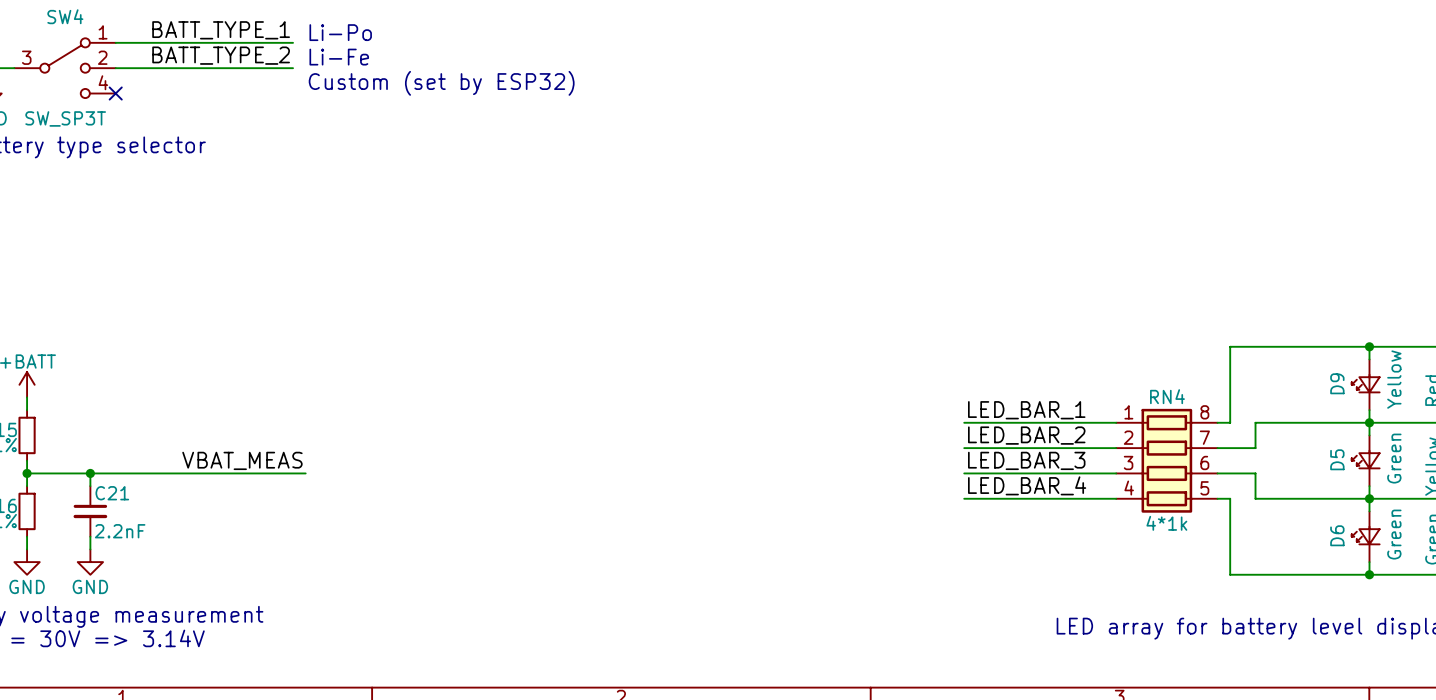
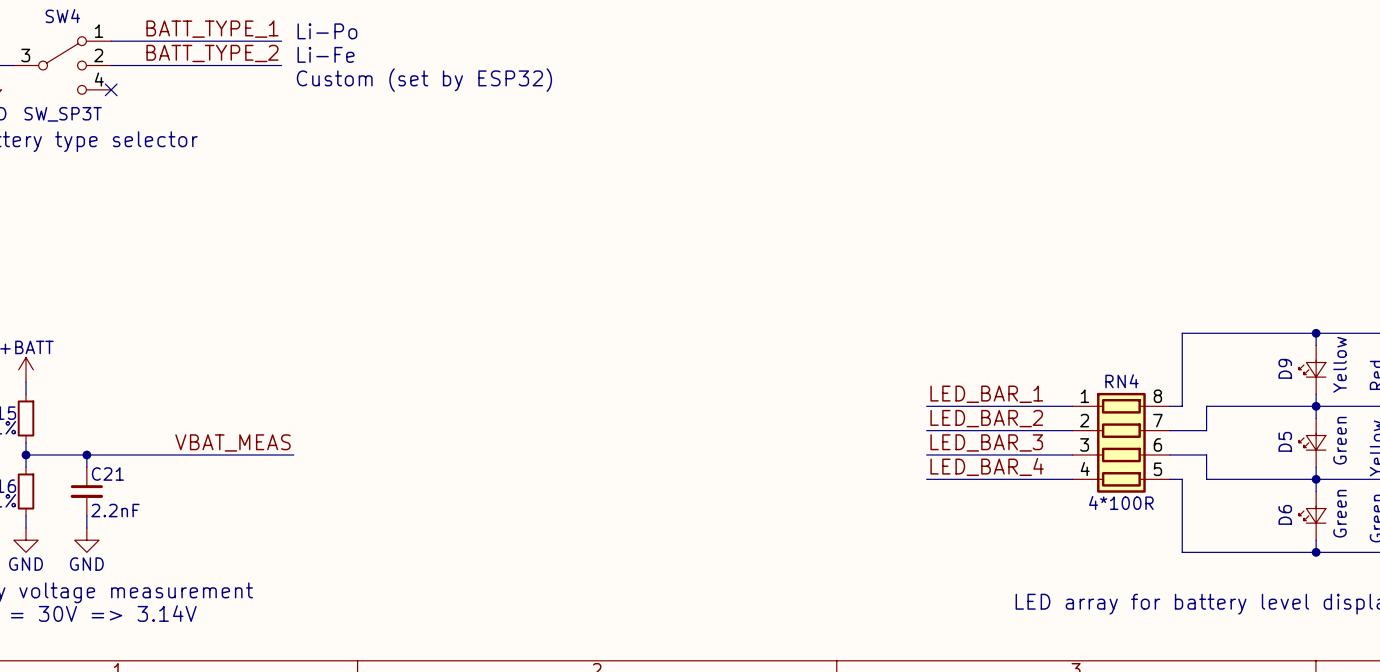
RN4 value: 4*1k (1166, 523) -> 4*100R (1121, 502)

